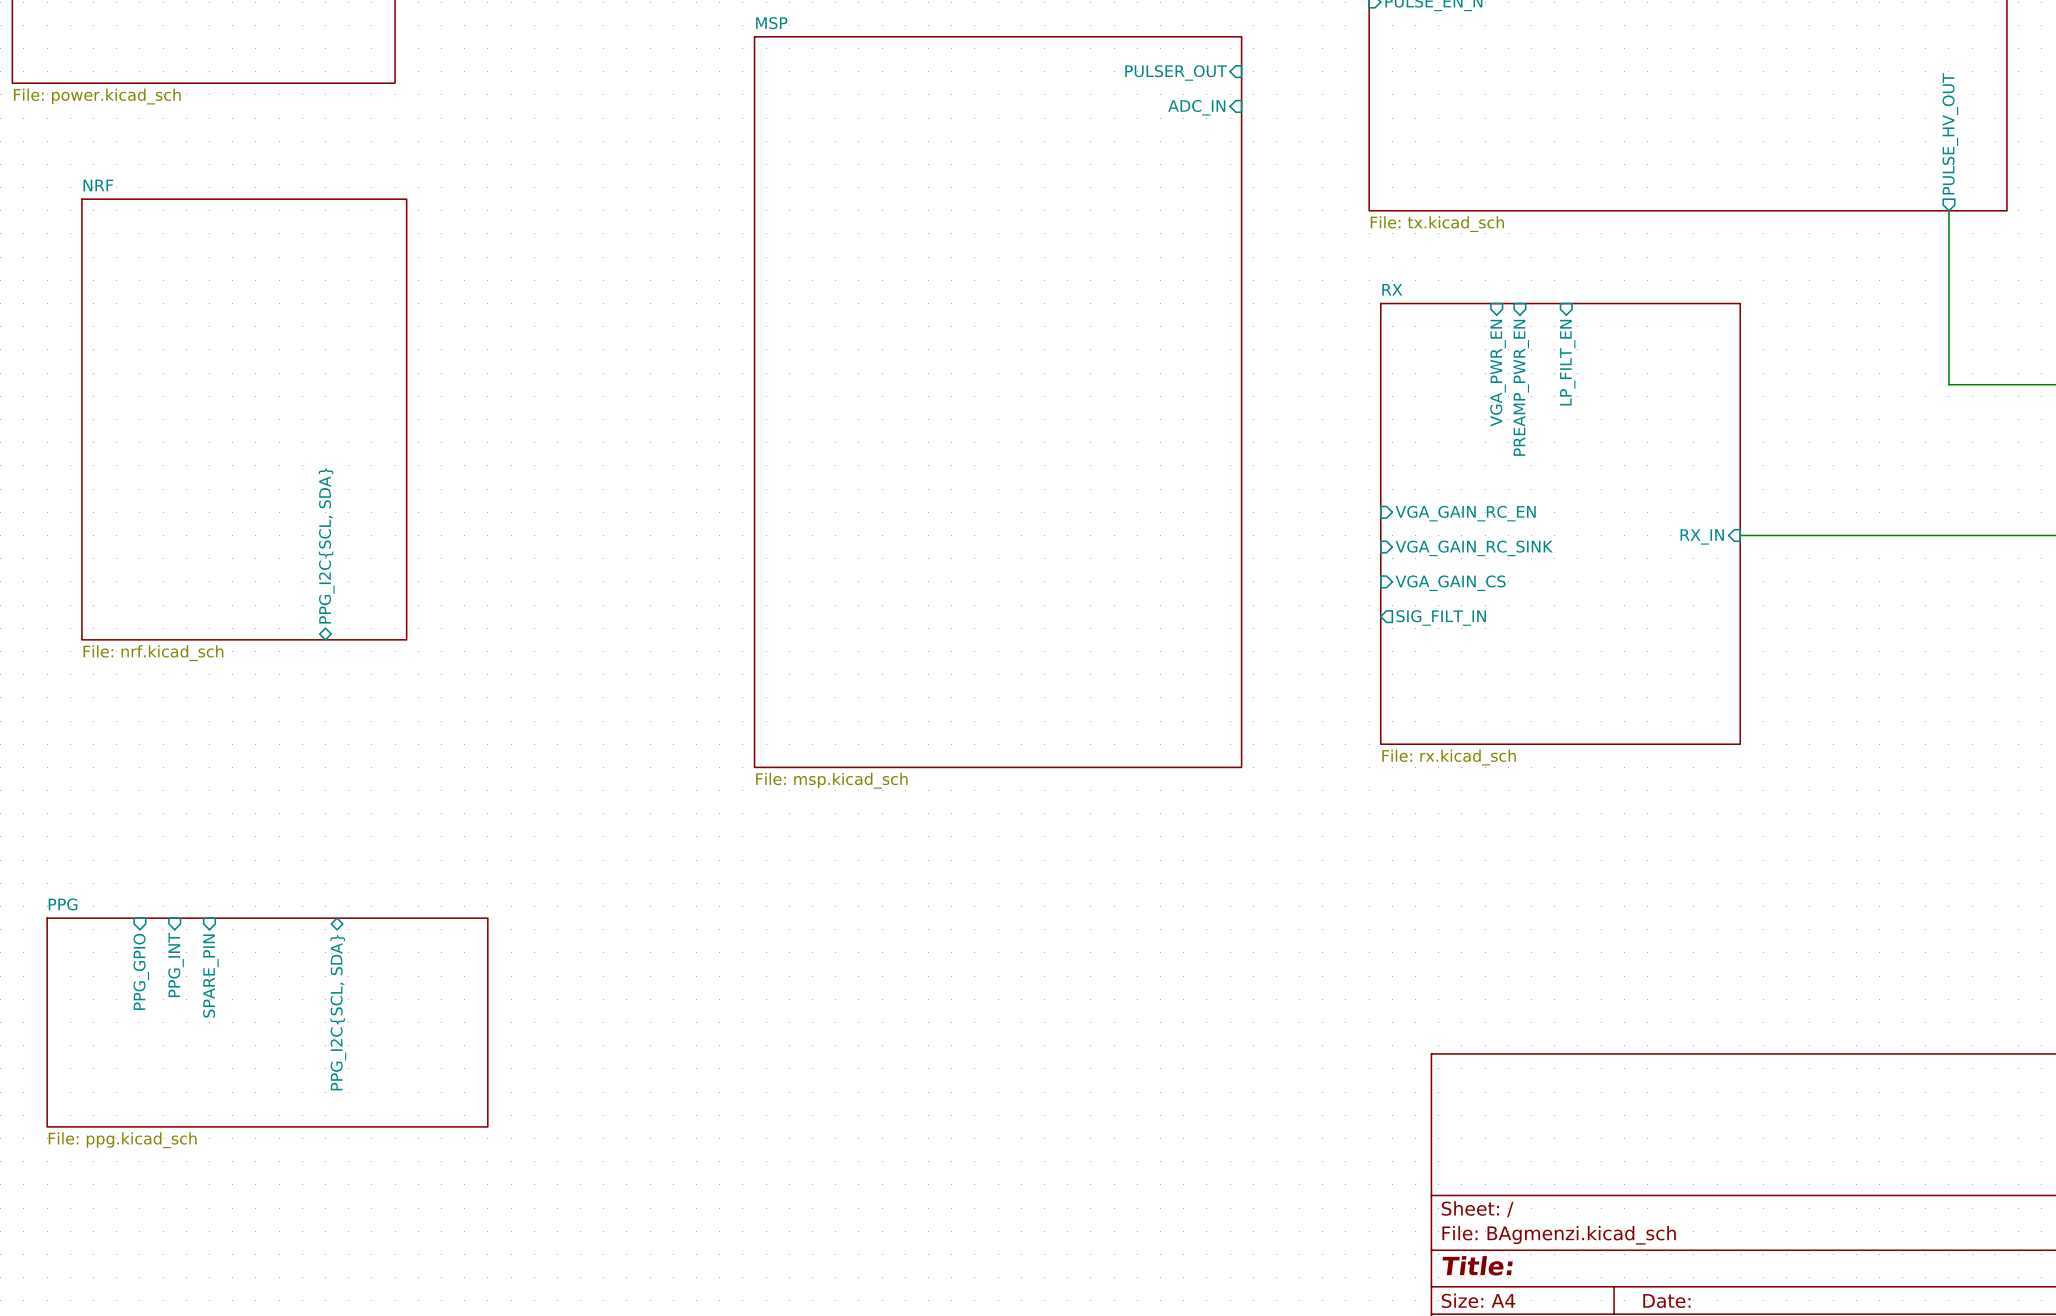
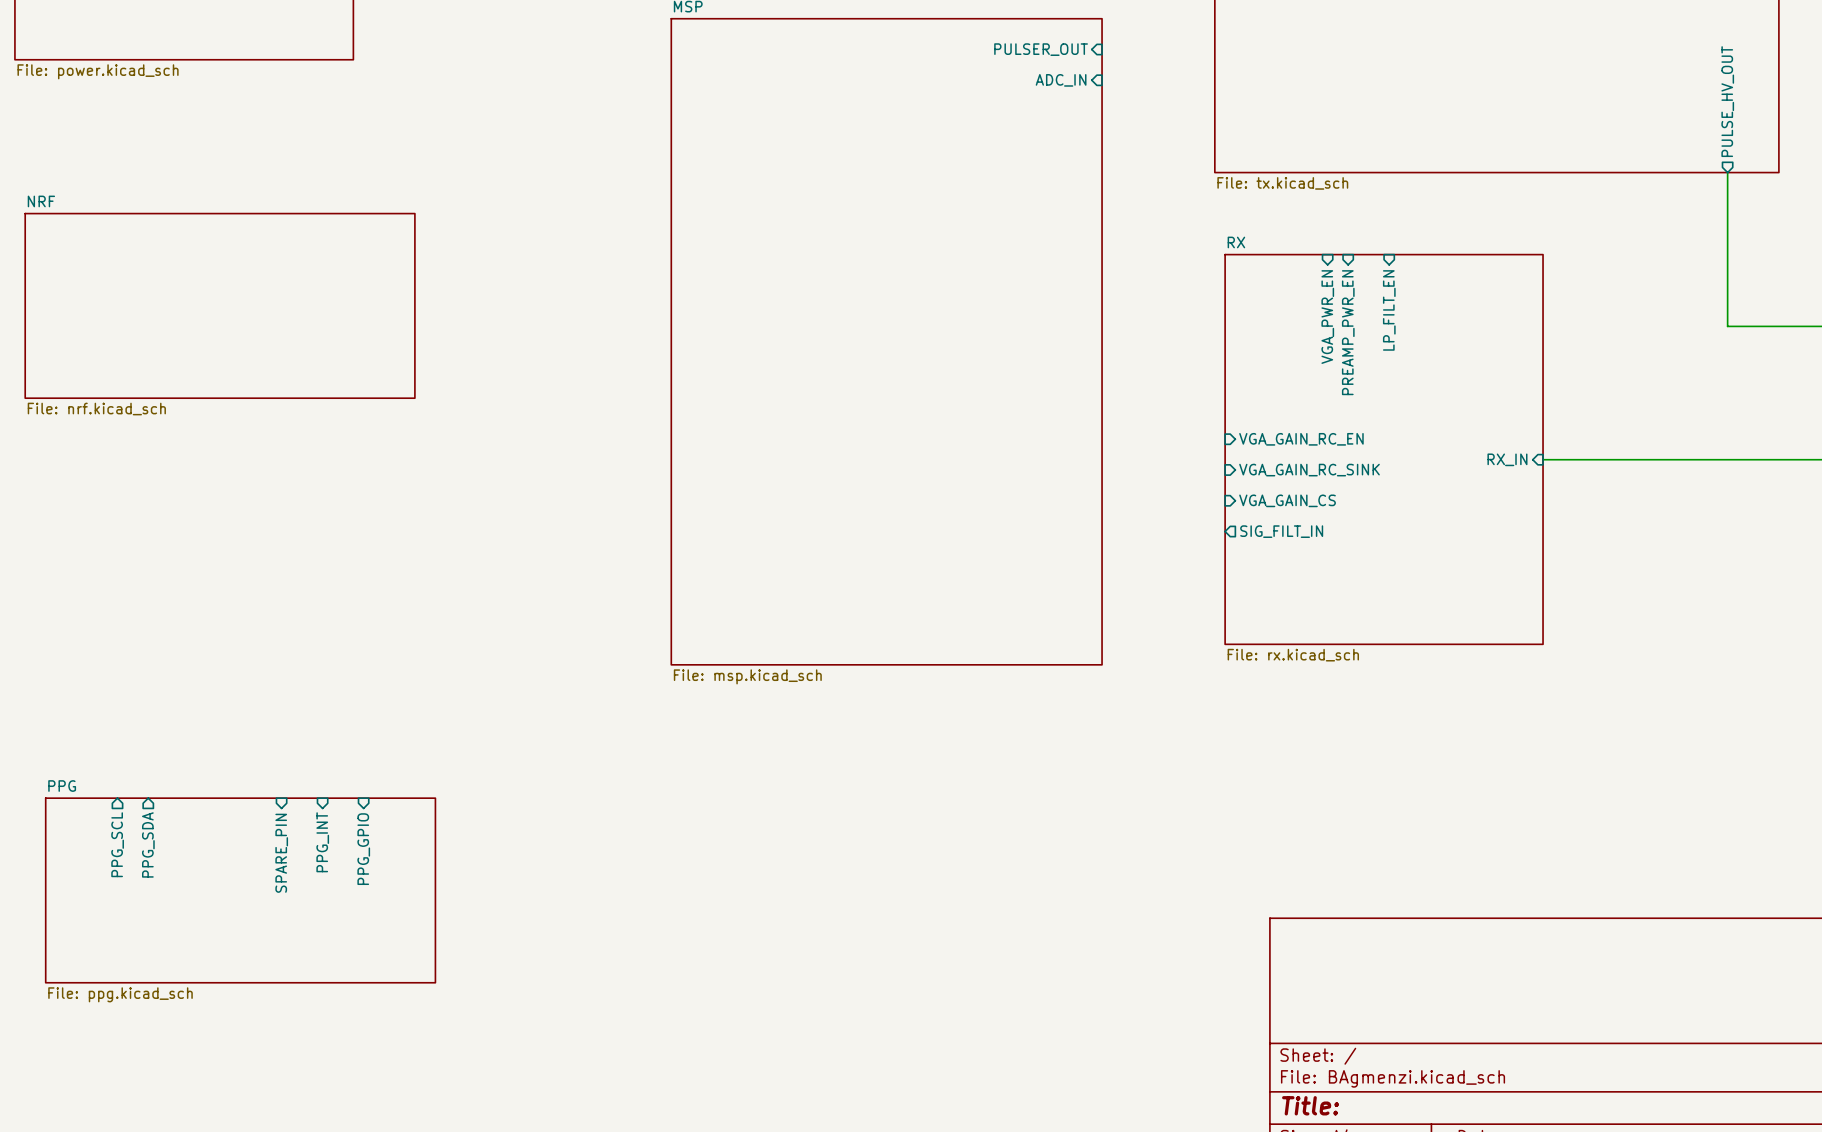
sheet NRF: none -> File: nrf.kicad_sch (220, 305)
sheet NRF: File: nrf.kicad_sch (244, 419) -> none
sheet pin: PPG_I2C{SCL, SDA} (326, 545) -> none
sheet pin position: PPG_INT (176, 964) -> PPG_INT (322, 842)
sheet pin: none -> PPG_SCL (117, 844)
sheet pin: none -> PPG_SDA (148, 844)
sheet pin: PPG_GPIO (141, 971) -> none
sheet pin: none -> PPG_GPIO (363, 849)
sheet pin position: SPARE_PIN (210, 976) -> SPARE_PIN (281, 853)
sheet pin: PPG_I2C{SCL, SDA} (338, 1012) -> none

